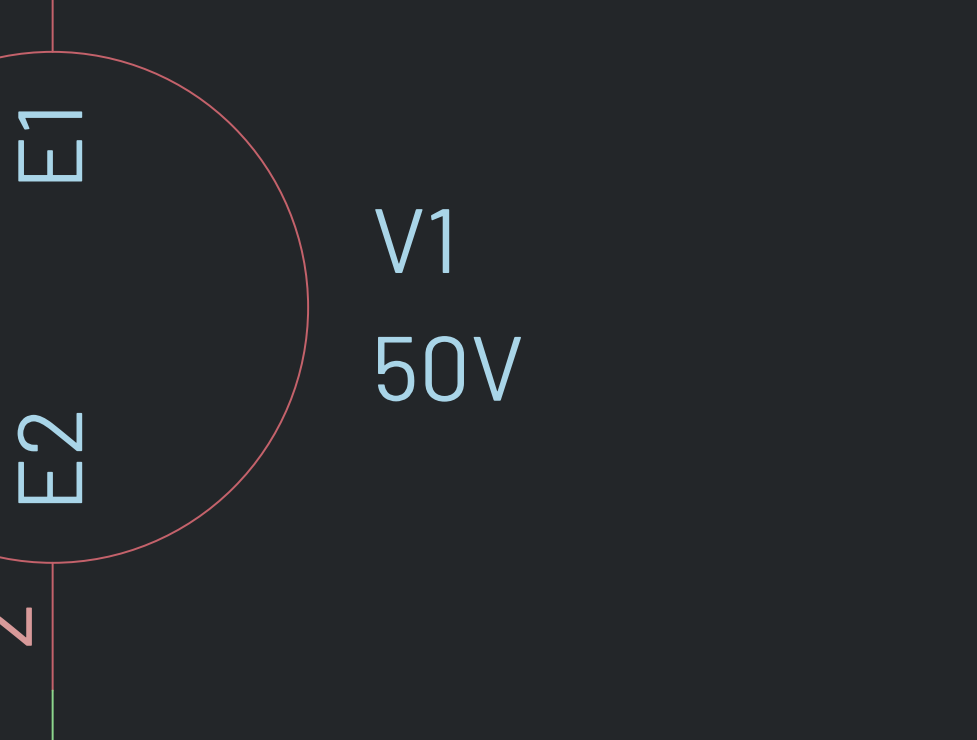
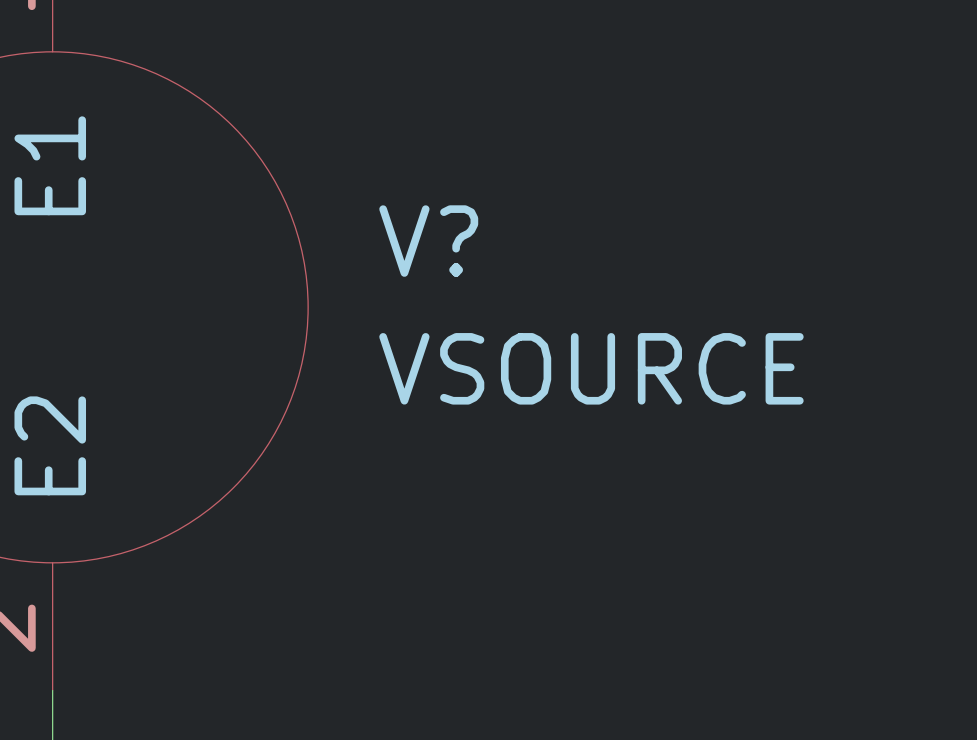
V1 name: V1 (412, 241) -> V? (428, 241)
V1 value: 50V (449, 368) -> VSOURCE (591, 368)

